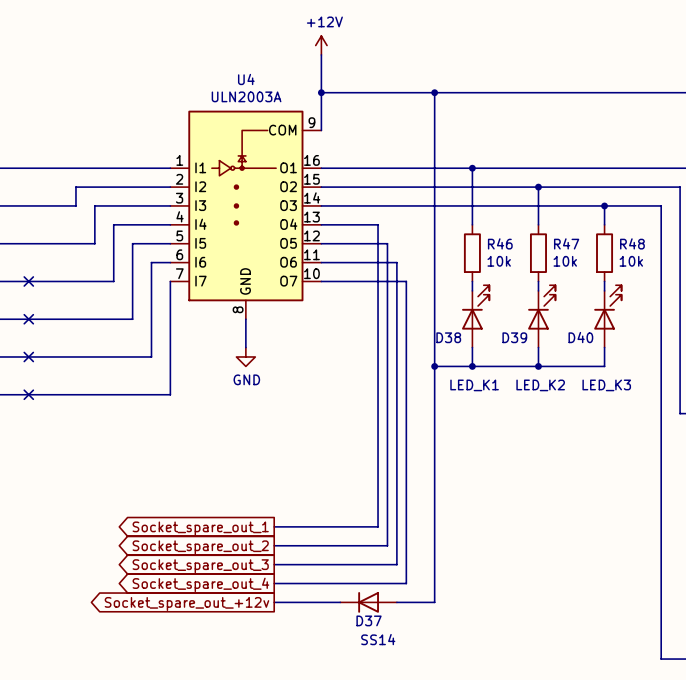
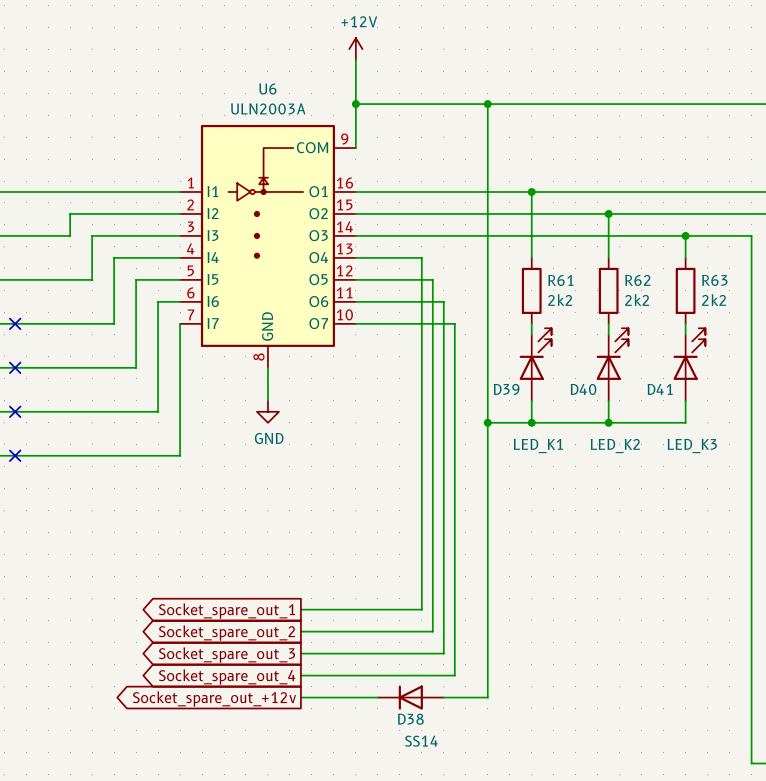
U4 name: U4 (246, 79) -> U6 (267, 88)
R46 name: R46 (500, 243) -> R61 (560, 280)
R47 name: R47 (566, 243) -> R62 (637, 280)
R48 name: R48 (632, 243) -> R63 (714, 280)
R46 value: 10k (499, 261) -> 2k2 (560, 300)
R47 value: 10k (565, 261) -> 2k2 (637, 300)
R48 value: 10k (631, 261) -> 2k2 (714, 300)
D38 name: D38 (448, 337) -> D39 (506, 389)
D39 name: D39 (514, 337) -> D40 (583, 389)
D40 name: D40 (580, 337) -> D41 (660, 389)
D37 name: D37 (369, 620) -> D38 (410, 719)

